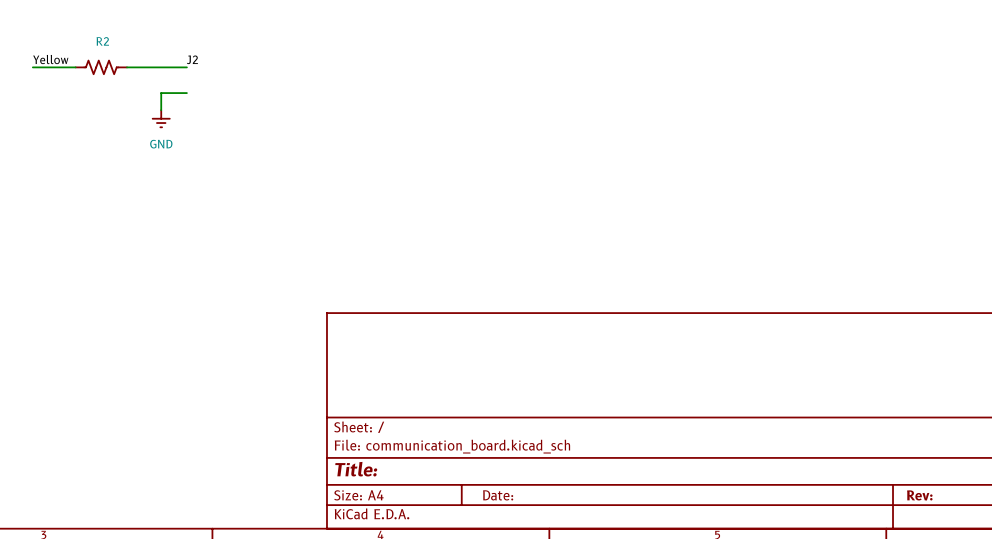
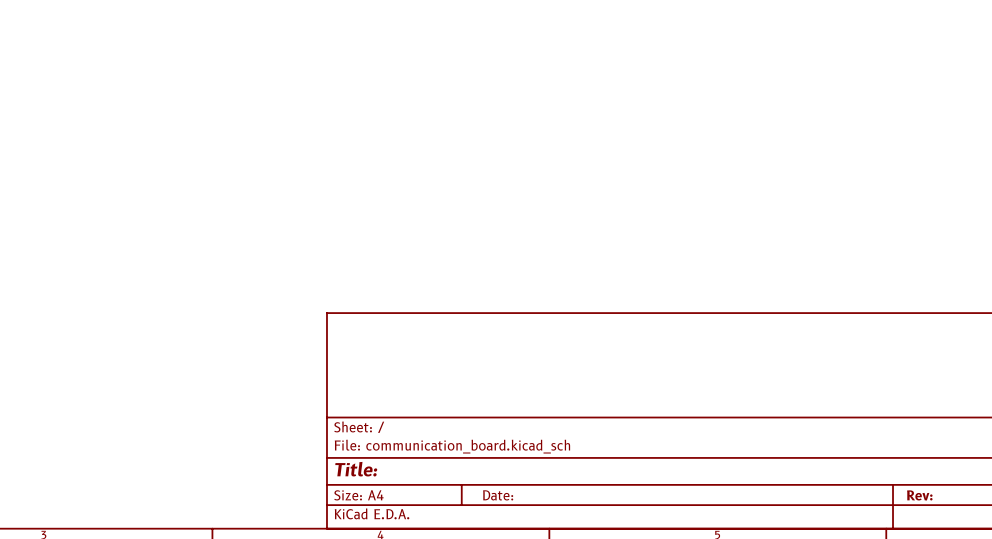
label: Yellow (50, 59) -> none
label: J2 (192, 59) -> none
wire: (32, 67) (75, 67) -> none
R2: (101, 67) -> none
wire: (126, 67) (186, 67) -> none
wire: (186, 93) (161, 93) (161, 110) -> none
power symbol: GND (161, 118) -> none

